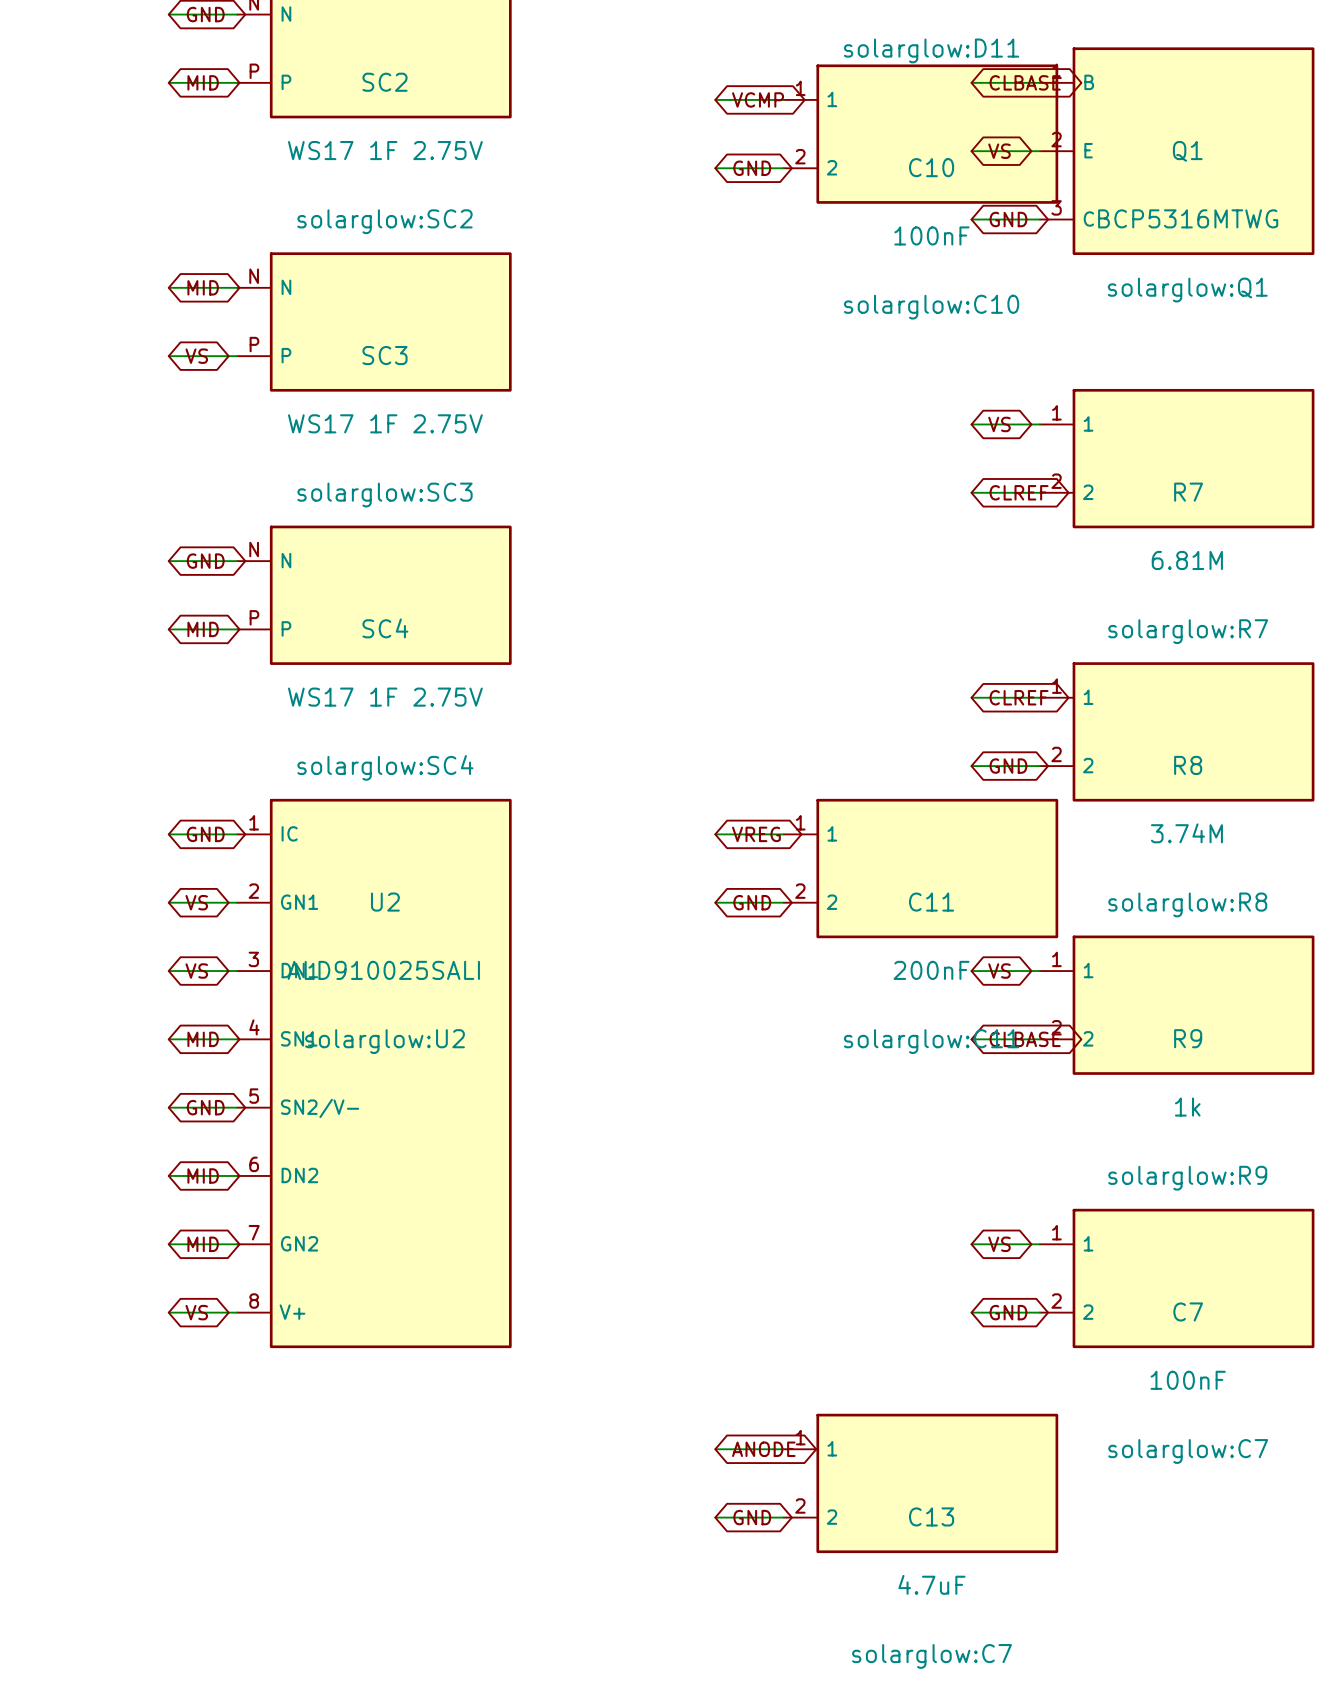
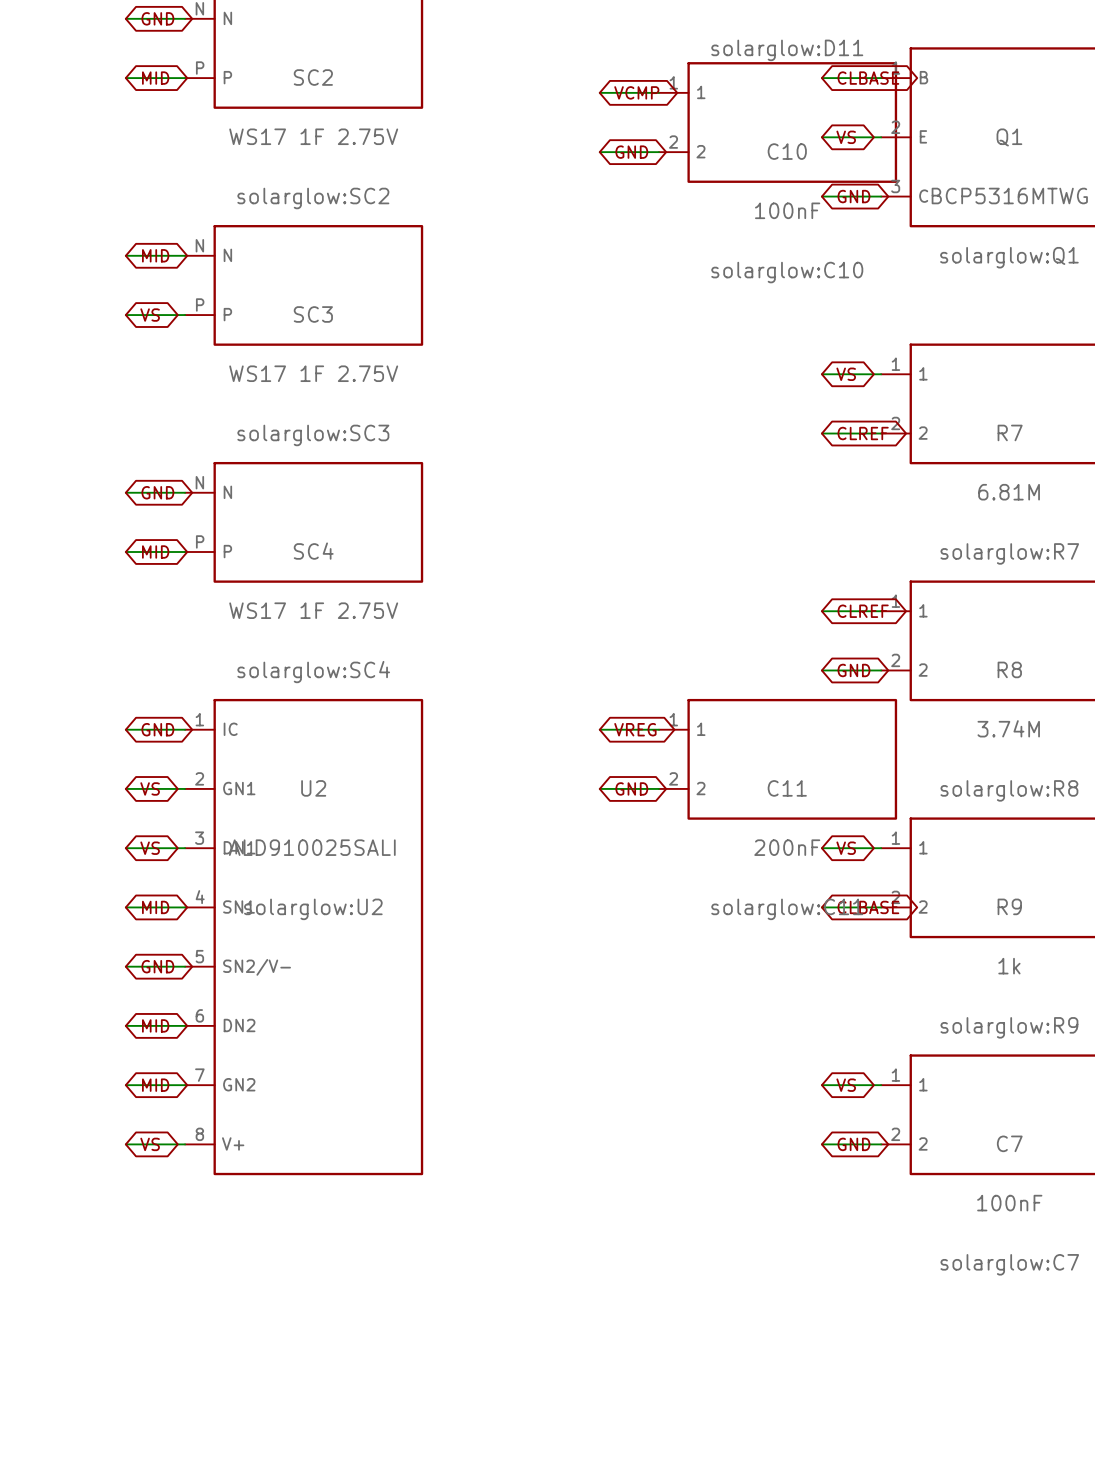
wire: (715, 1449) (783, 1449) -> none
global label: ANODE (763, 1449) -> none
C13: 4.7uF (920, 1483) -> none
wire: (715, 1517) (783, 1517) -> none
global label: GND (752, 1517) -> none

